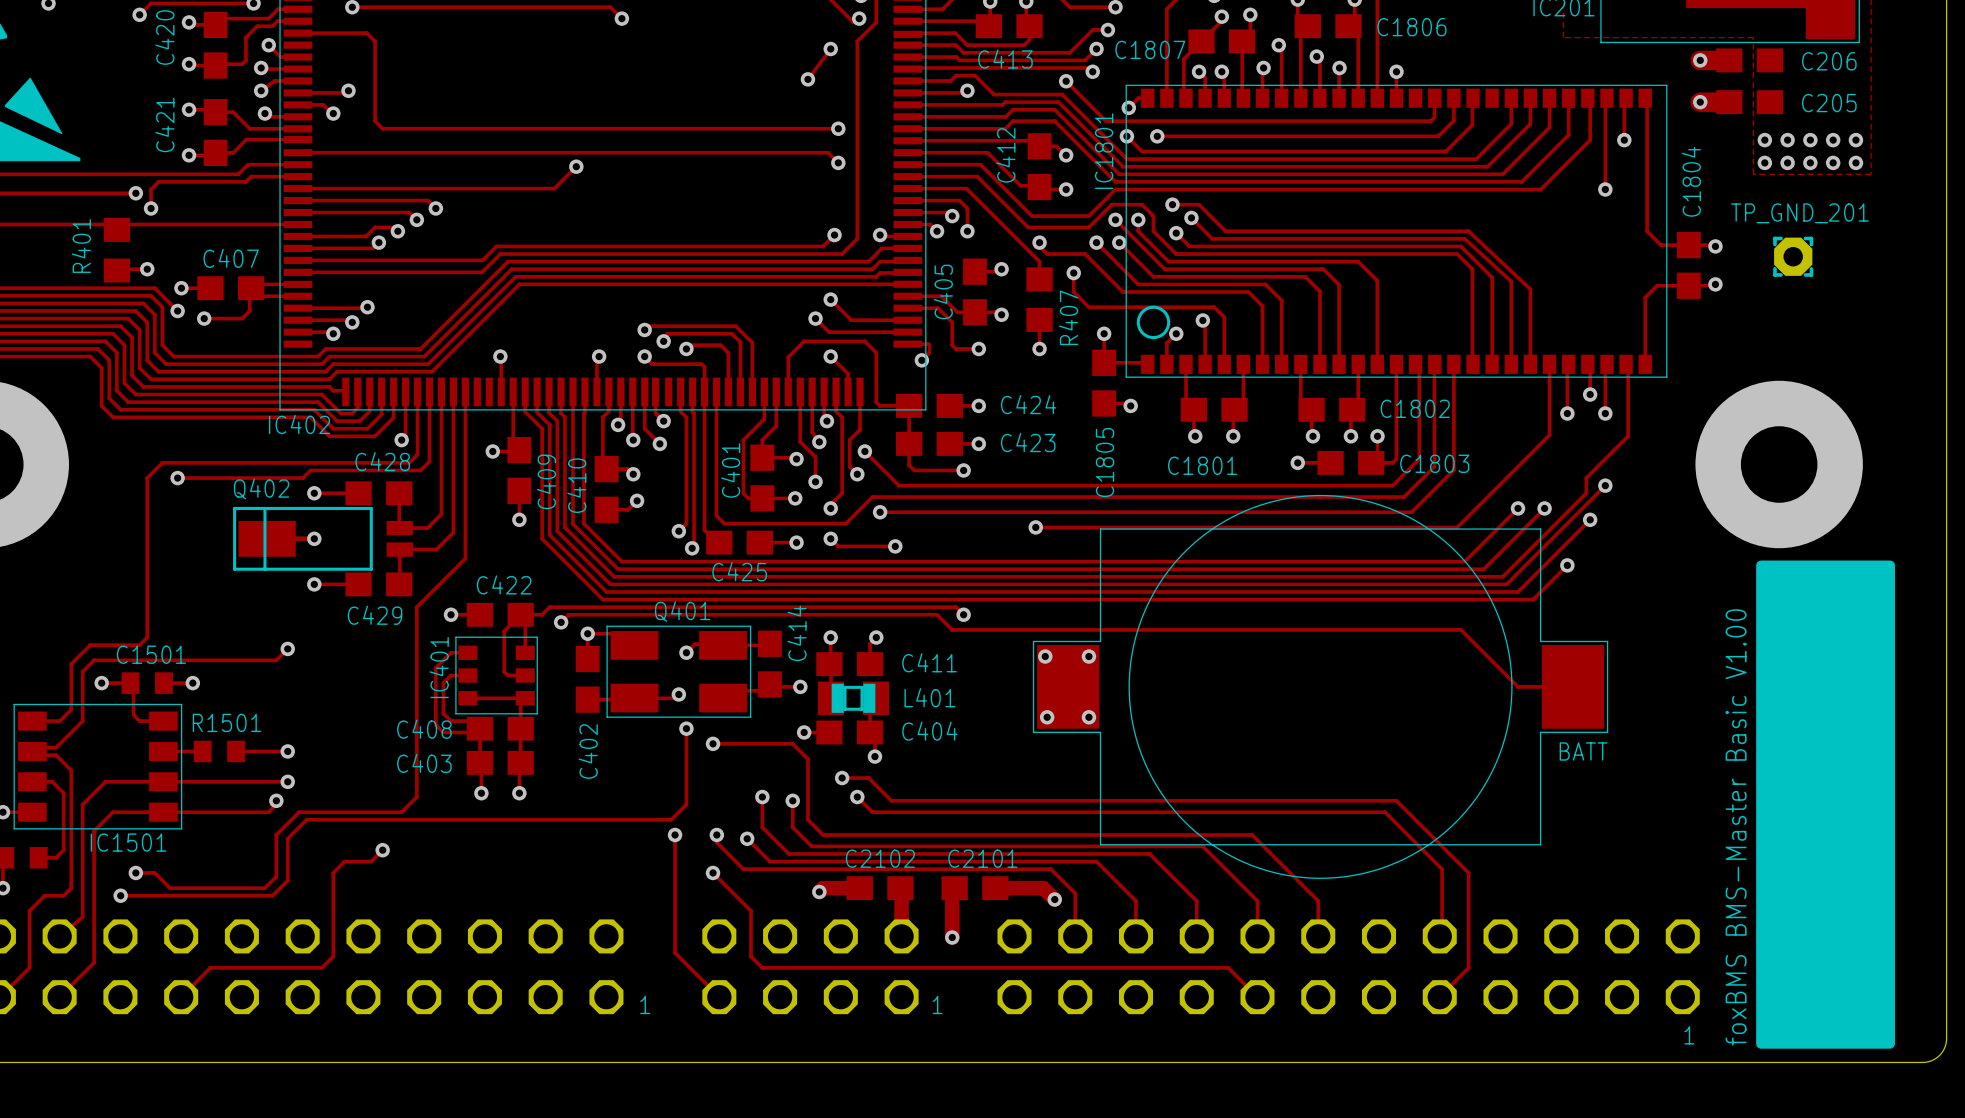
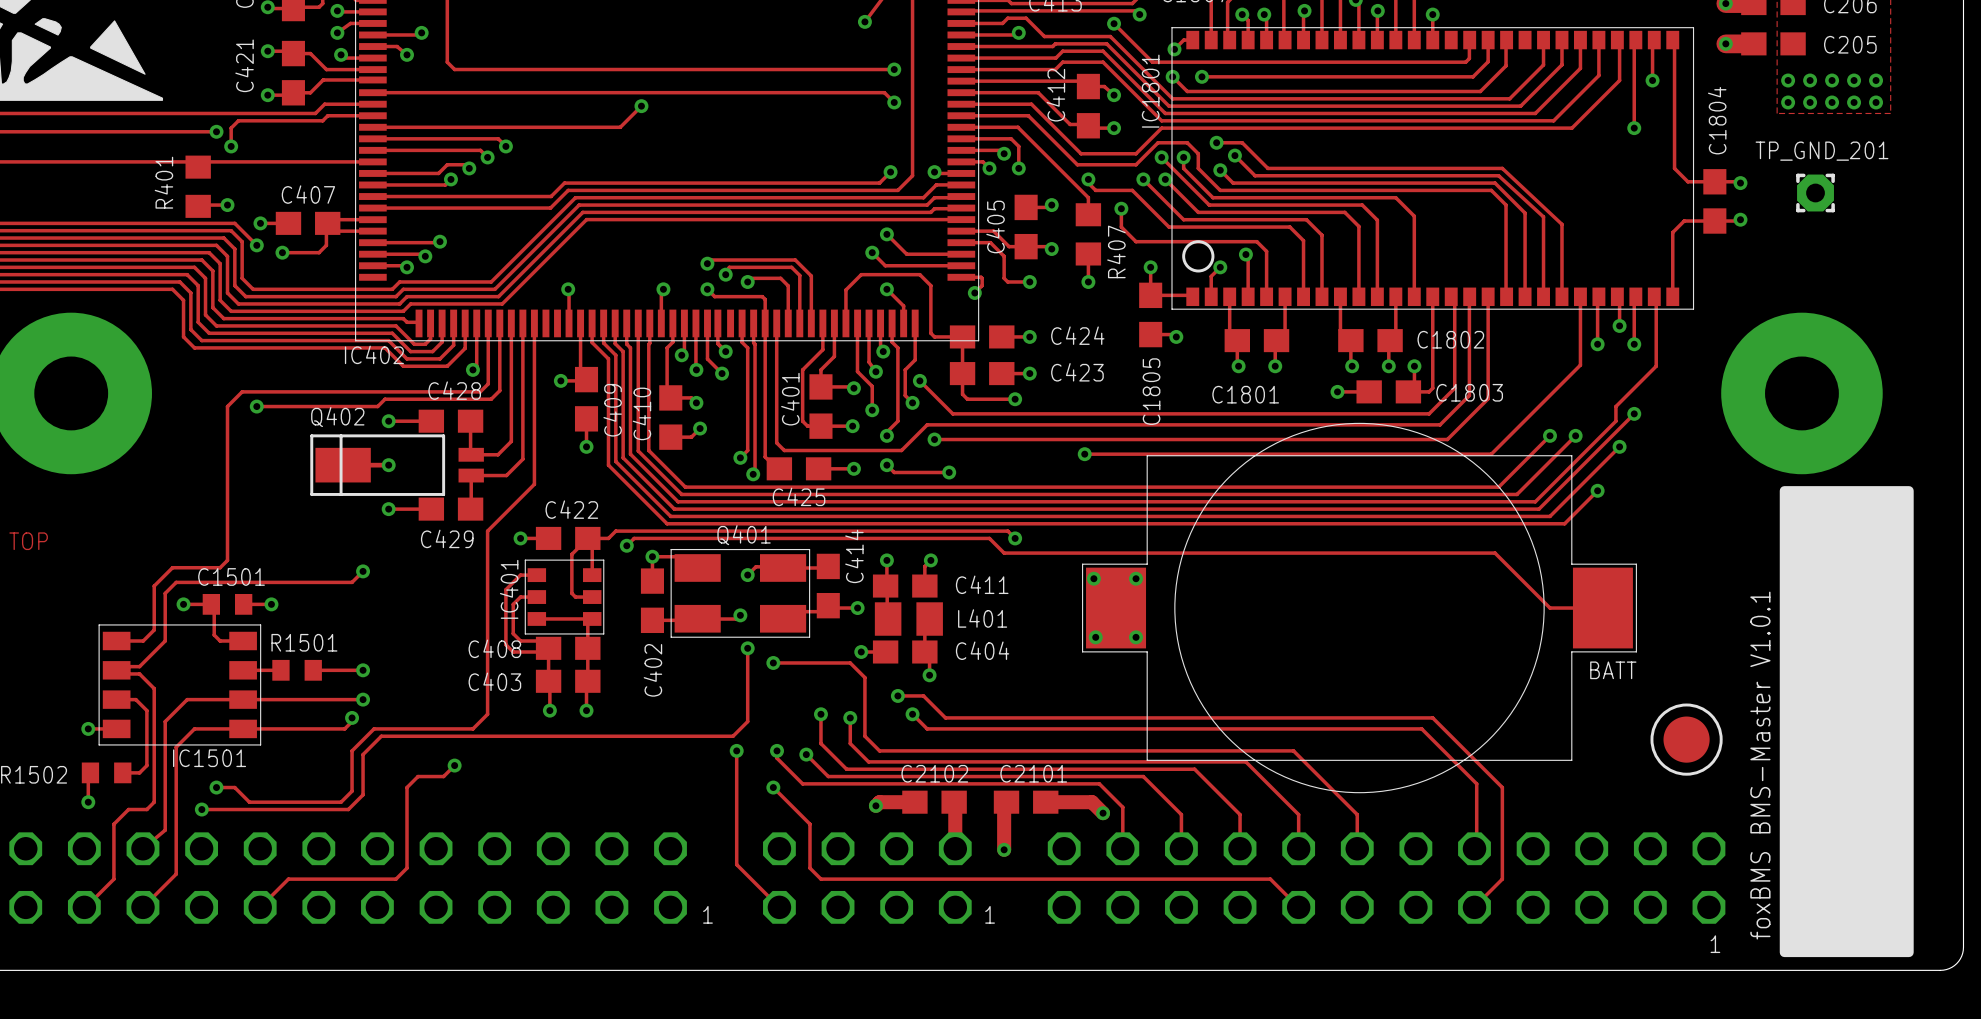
L401 footprint: [817, 681, 890, 716] -> [874, 602, 943, 636]
drawing: none -> [1650, 703, 1723, 776]
text: foxBMS BMS-Master Basic V1.00 (1736, 827) -> foxBMS BMS-Master V1.0.1 (1760, 765)

